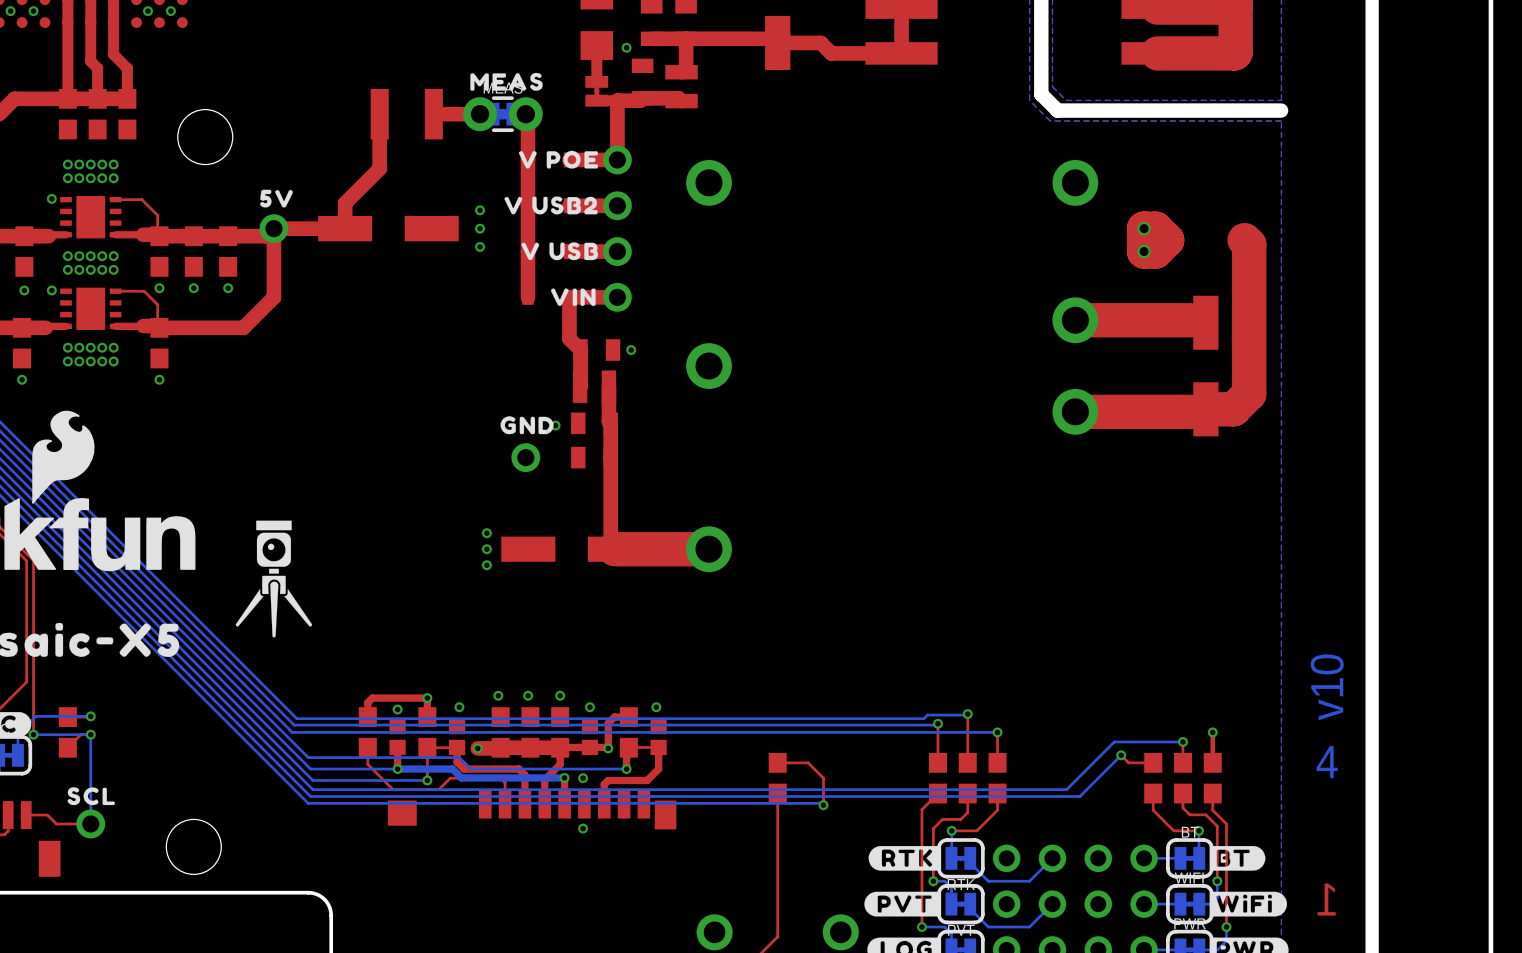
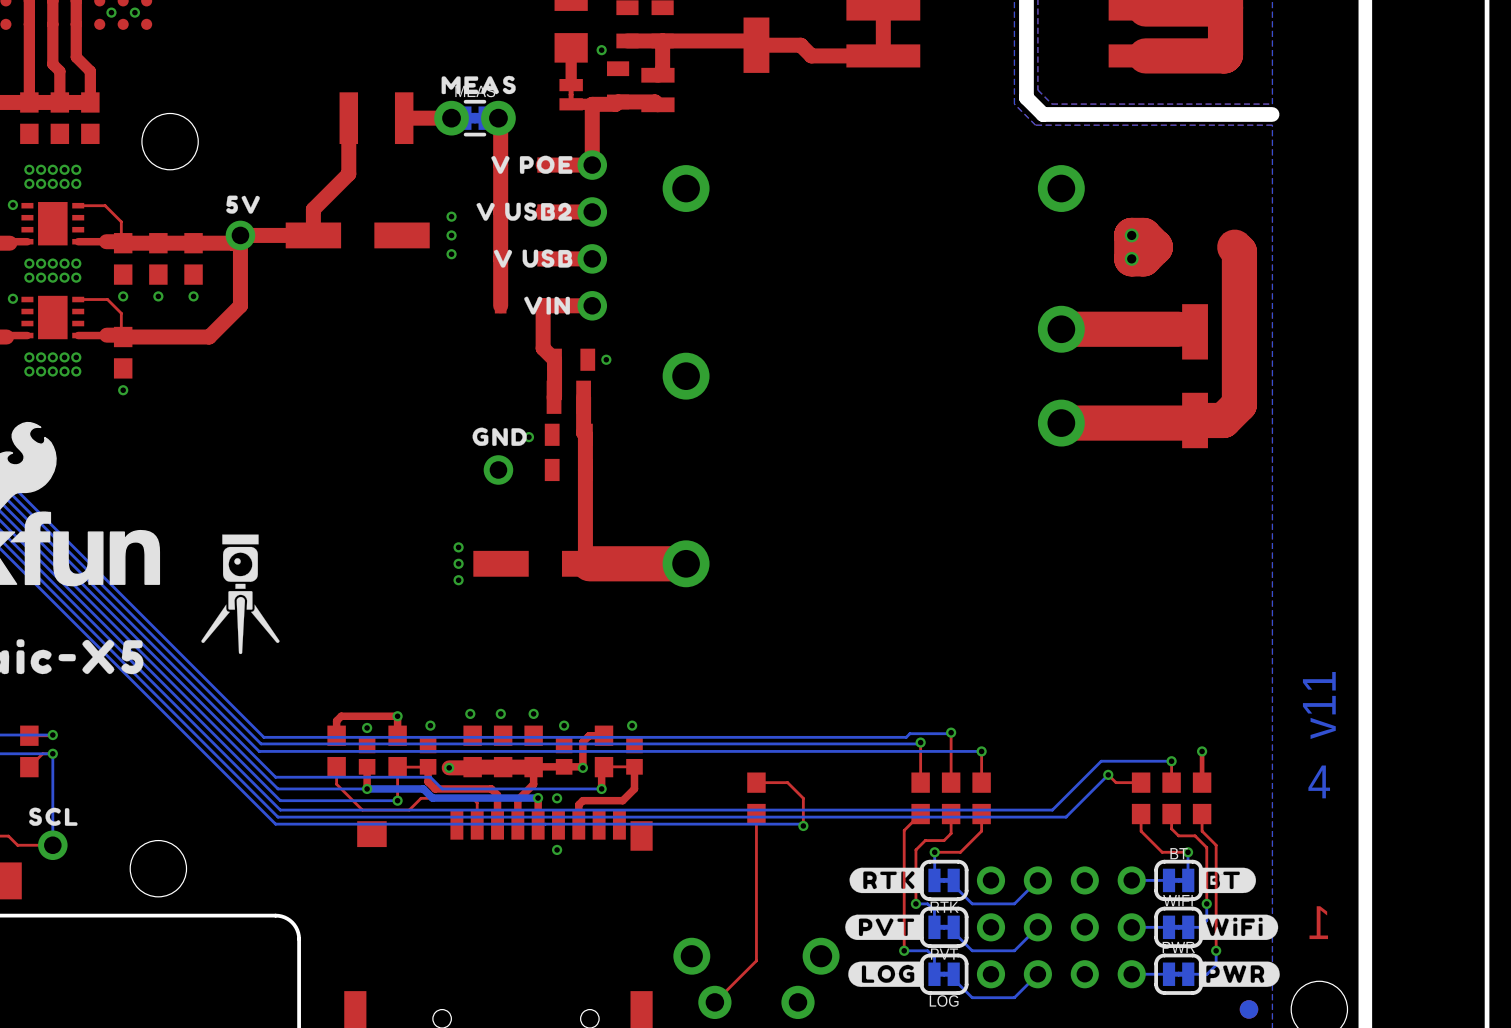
text: v10 (1327, 687) -> v11 (1319, 705)

